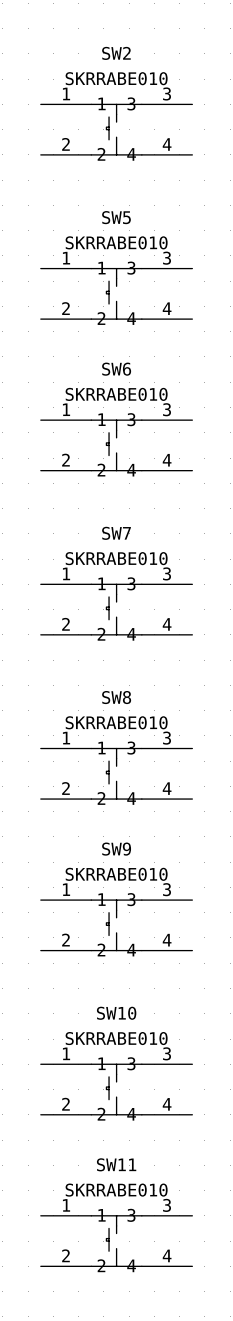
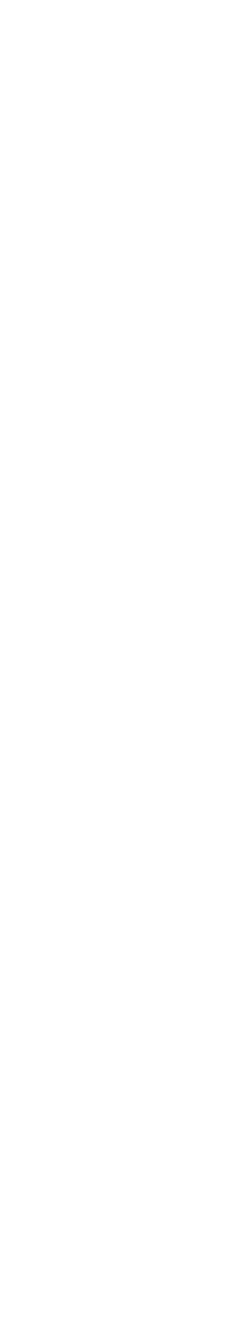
SW2: SKRRABE010 (116, 129) -> none
SW5: SKRRABE010 (116, 293) -> none
SW6: SKRRABE010 (116, 445) -> none
SW7: SKRRABE010 (116, 609) -> none
SW8: SKRRABE010 (116, 773) -> none
SW9: SKRRABE010 (116, 925) -> none
SW10: SKRRABE010 (116, 1089) -> none
SW11: SKRRABE010 (116, 1241) -> none

